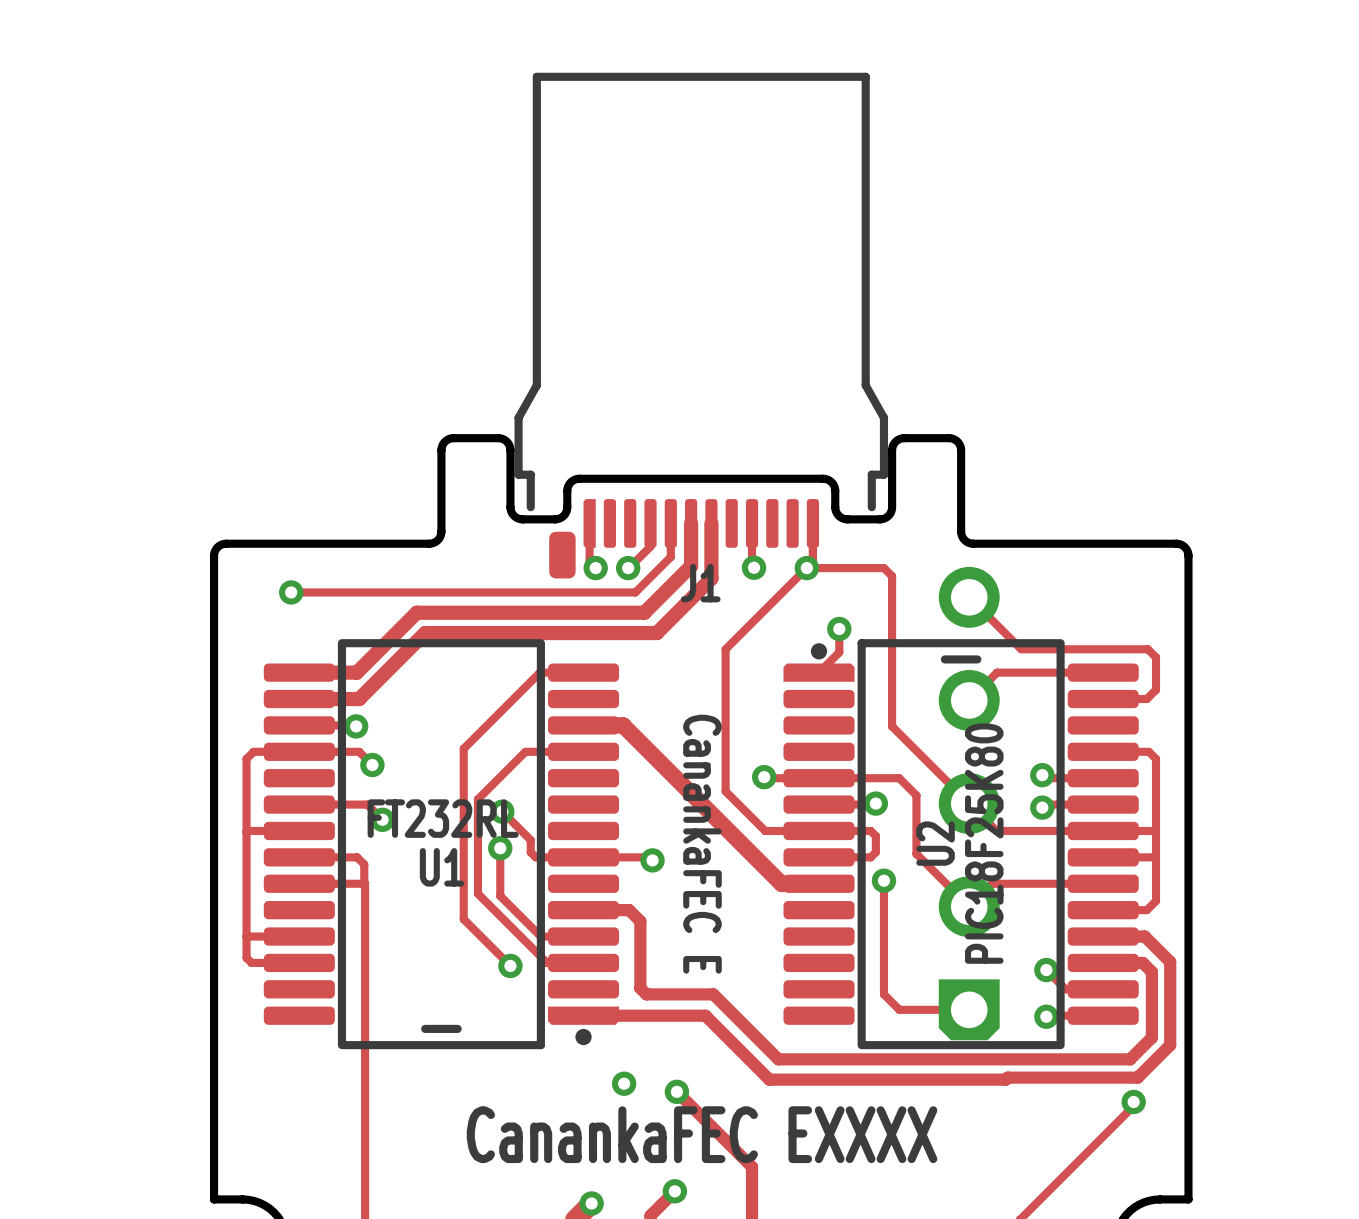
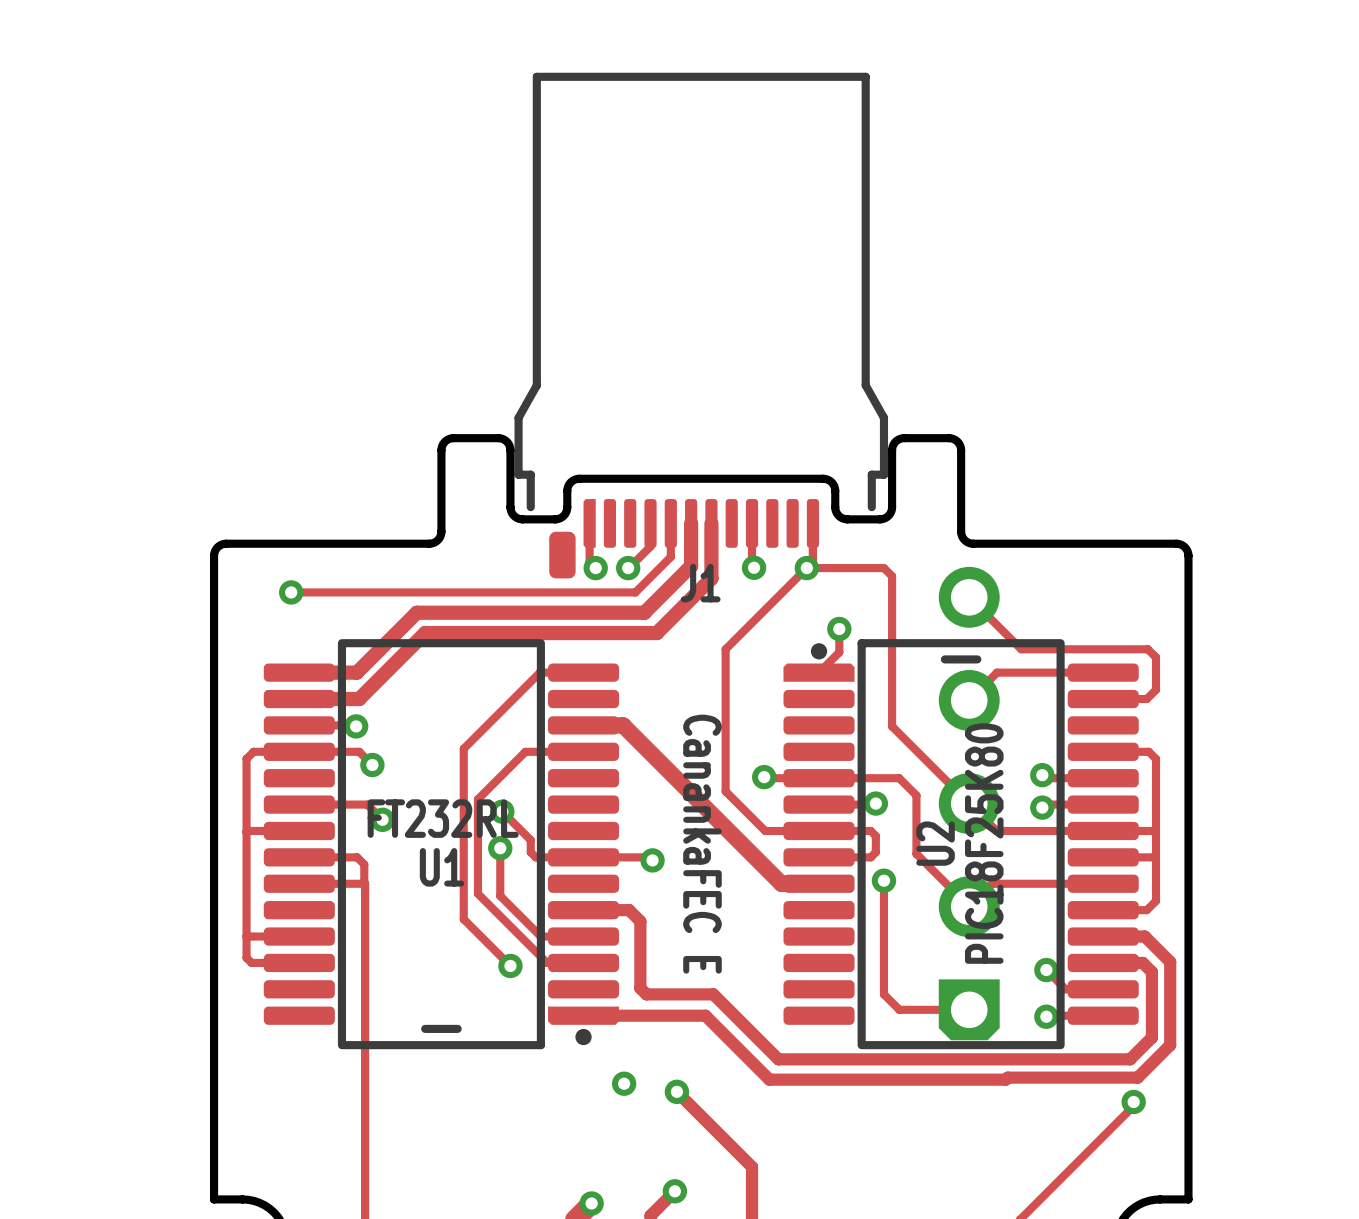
text: CanankaFEC EXXXX (702, 1134) -> none

